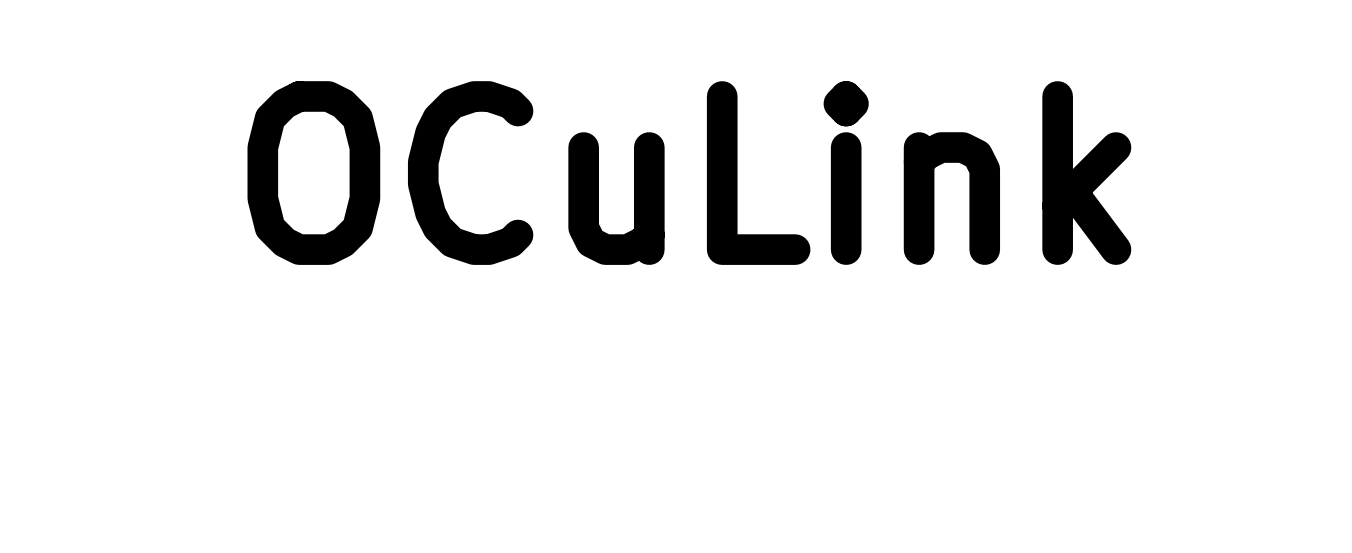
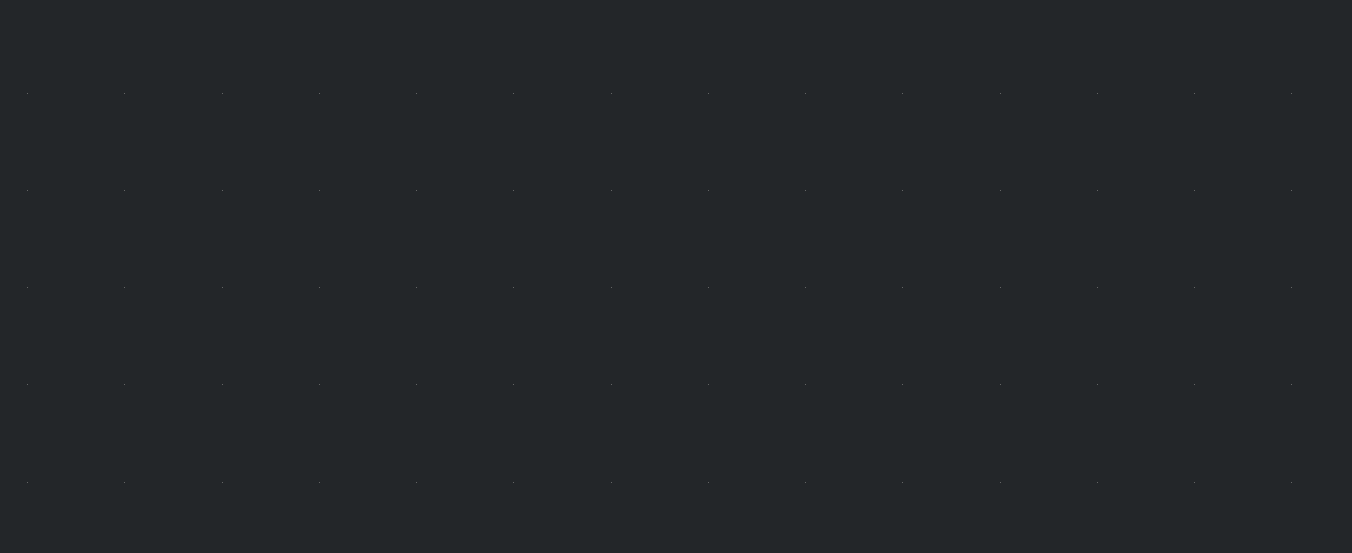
text: OCuLink (689, 173) -> none

